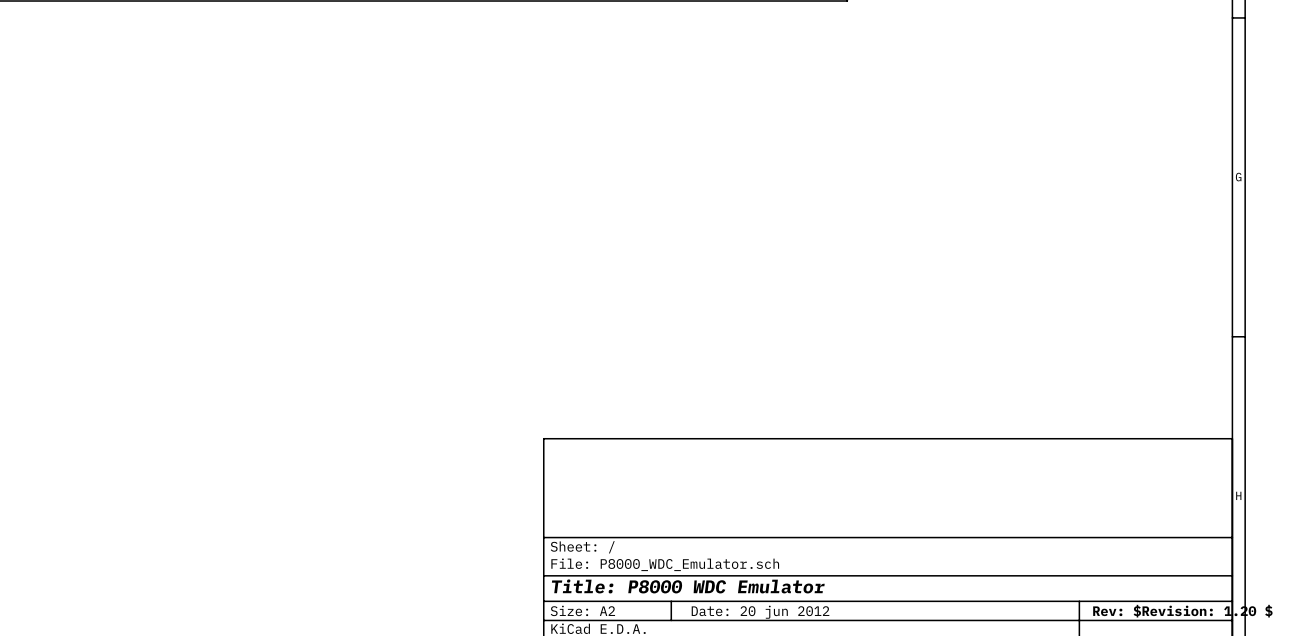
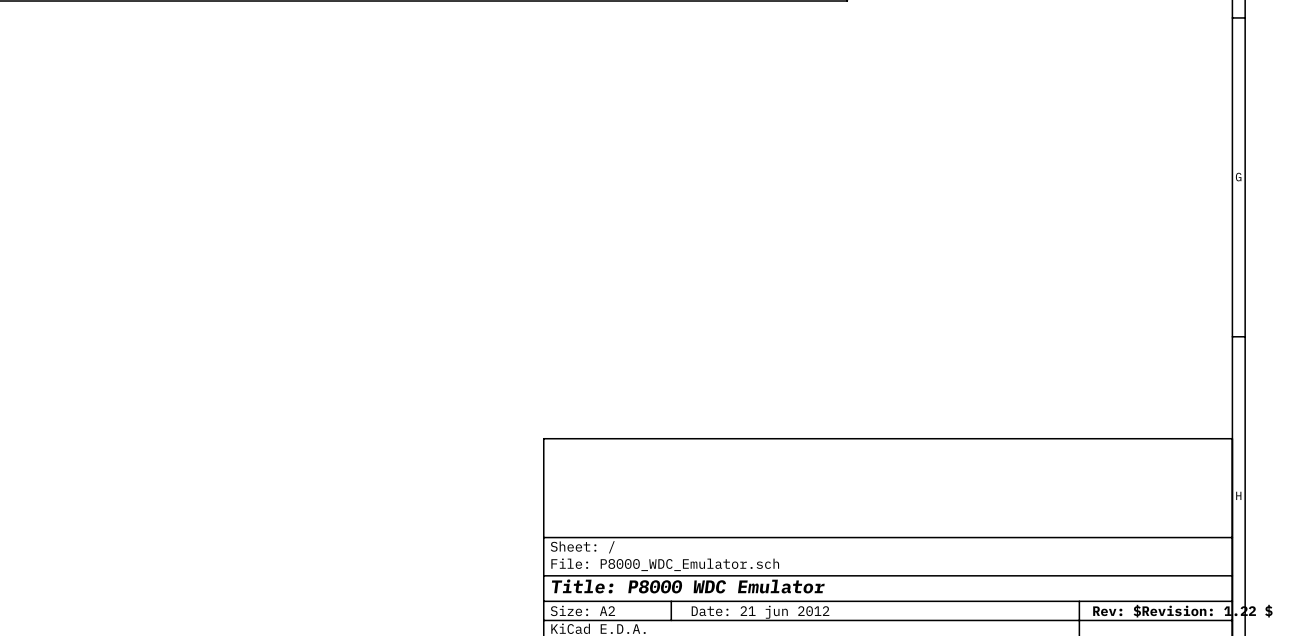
title block: Rev: $Revision: 1.20 $ (1182, 611) -> Rev: $Revision: 1.22 $ (1182, 611)
title block: Date: 20 jun 2012 (760, 612) -> Date: 21 jun 2012 (760, 612)

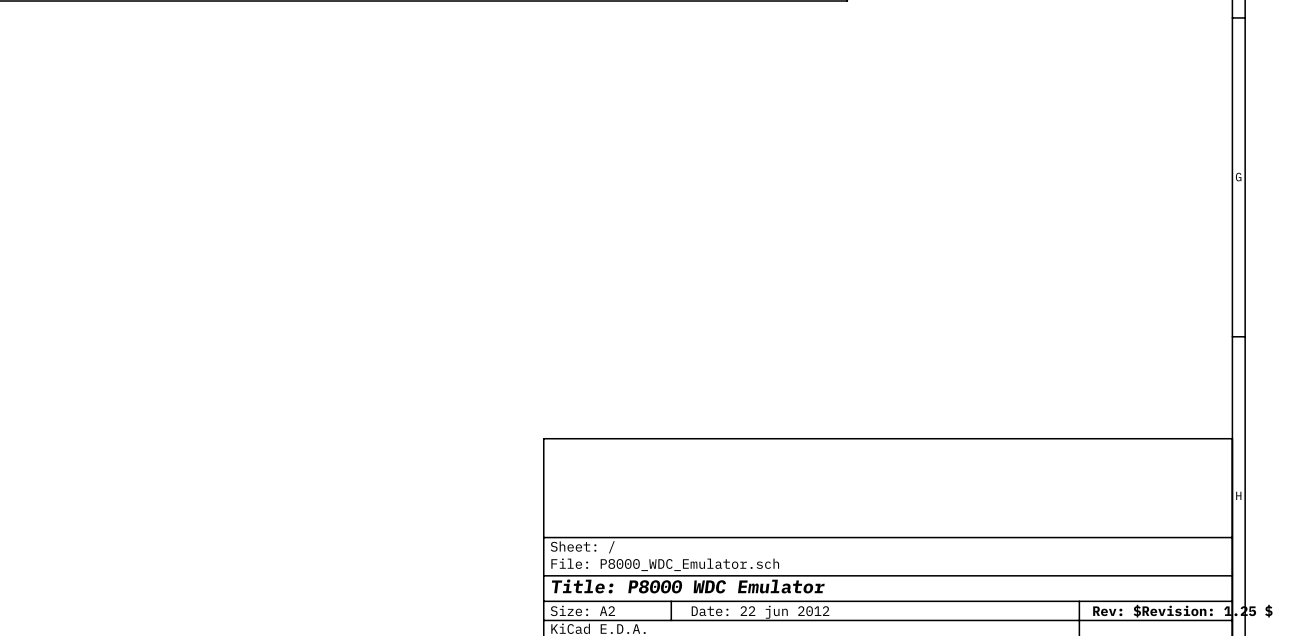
title block: Rev: $Revision: 1.22 $ (1182, 611) -> Rev: $Revision: 1.25 $ (1182, 611)
title block: Date: 21 jun 2012 (760, 612) -> Date: 22 jun 2012 (760, 612)

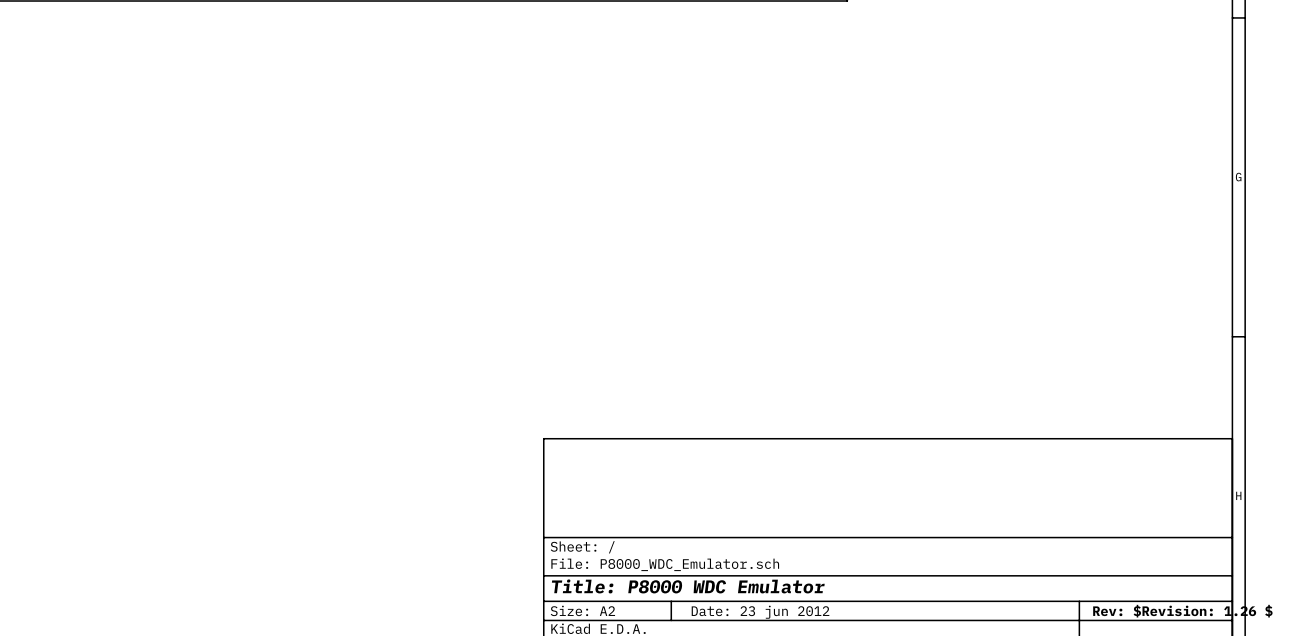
title block: Rev: $Revision: 1.25 $ (1182, 611) -> Rev: $Revision: 1.26 $ (1182, 611)
title block: Date: 22 jun 2012 (760, 612) -> Date: 23 jun 2012 (760, 612)

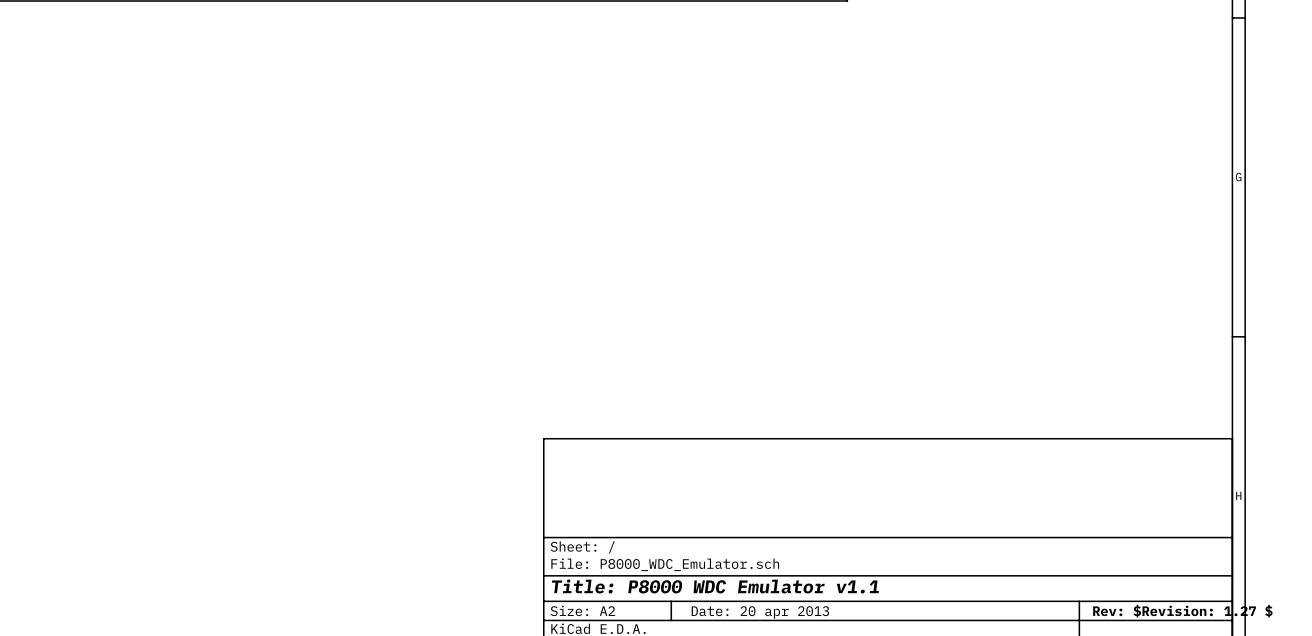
title block: Title: P8000 WDC Emulator (688, 586) -> Title: P8000 WDC Emulator v1.1 (715, 586)
title block: Rev: $Revision: 1.26 $ (1182, 611) -> Rev: $Revision: 1.27 $ (1182, 611)
title block: Date: 23 jun 2012 (760, 612) -> Date: 20 apr 2013 (760, 612)

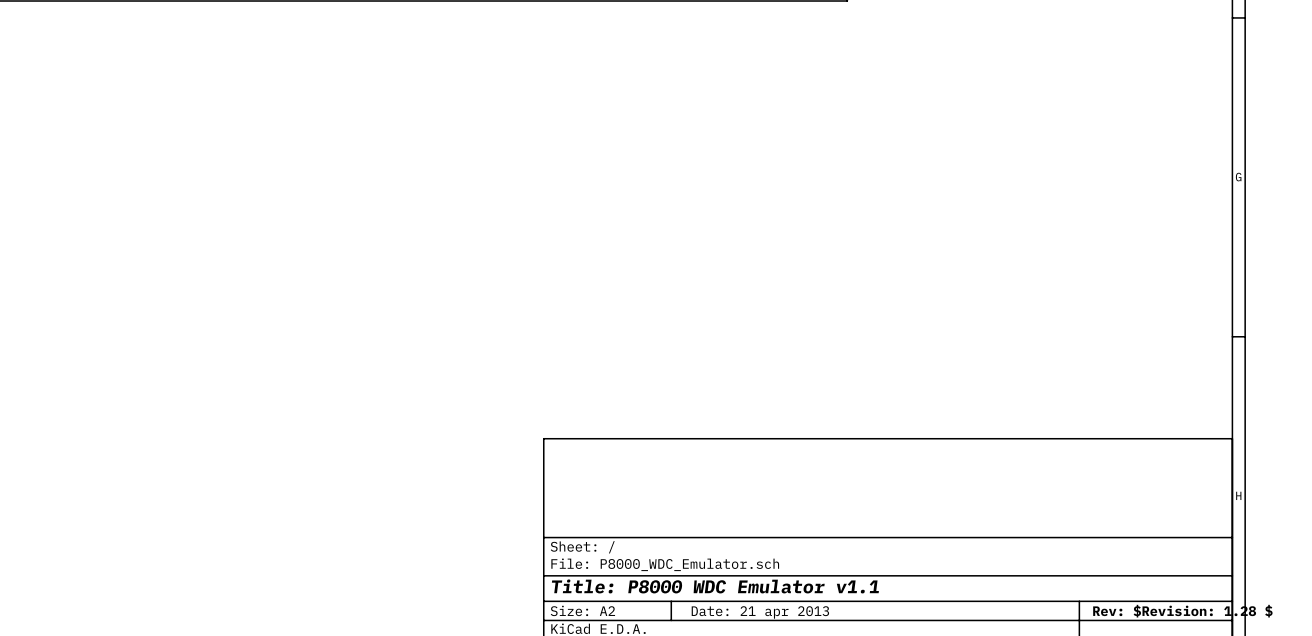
title block: Rev: $Revision: 1.27 $ (1182, 611) -> Rev: $Revision: 1.28 $ (1182, 611)
title block: Date: 20 apr 2013 (760, 612) -> Date: 21 apr 2013 (760, 612)

